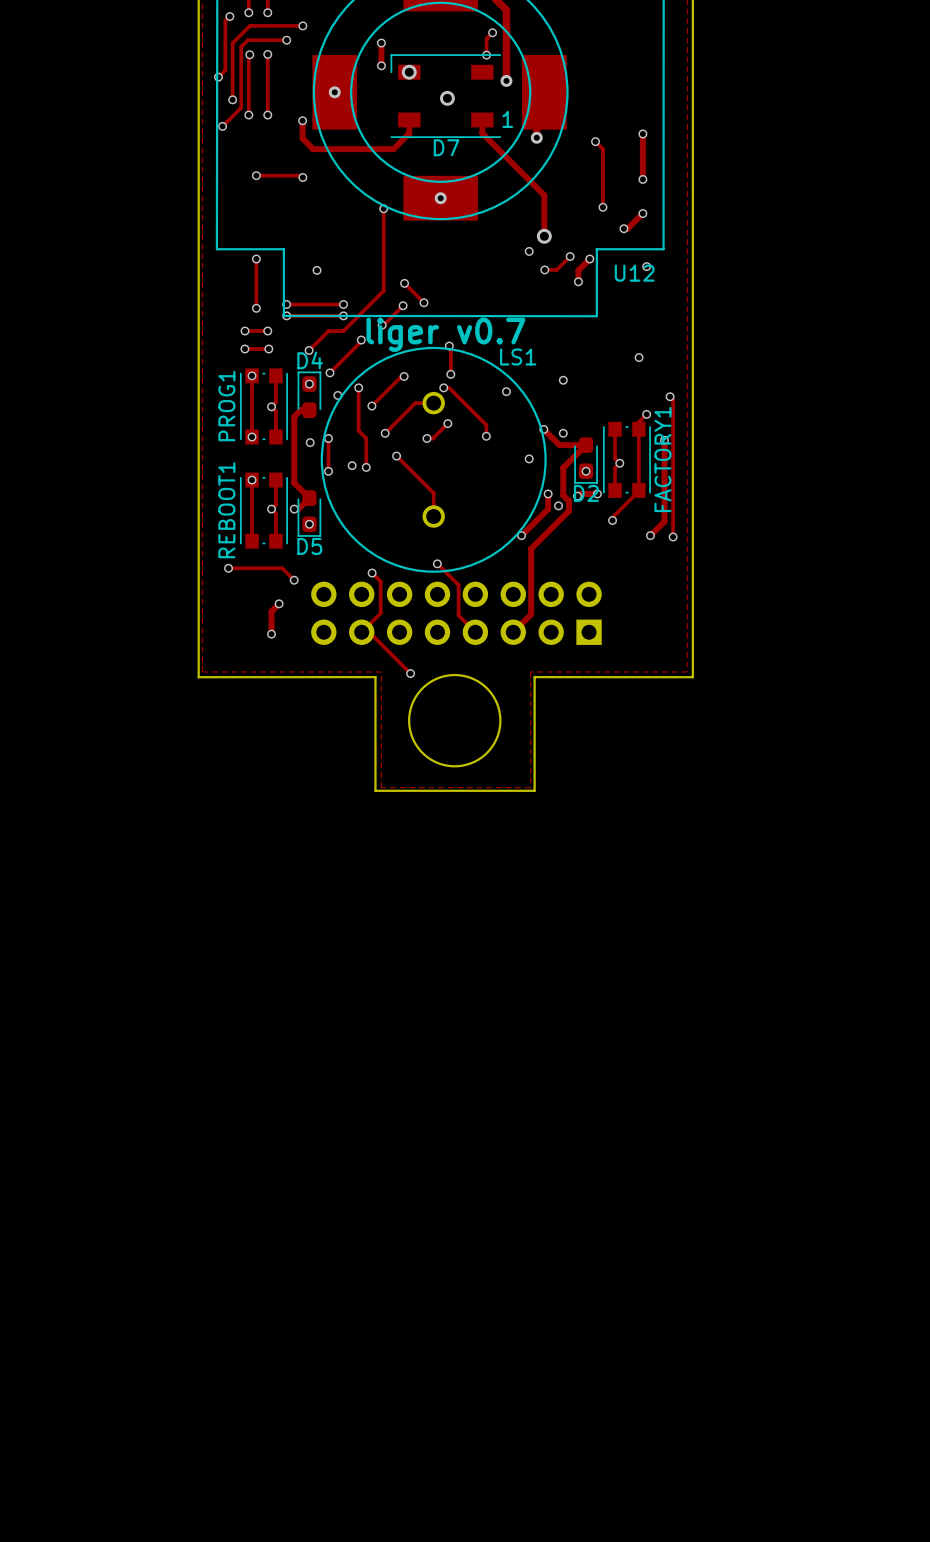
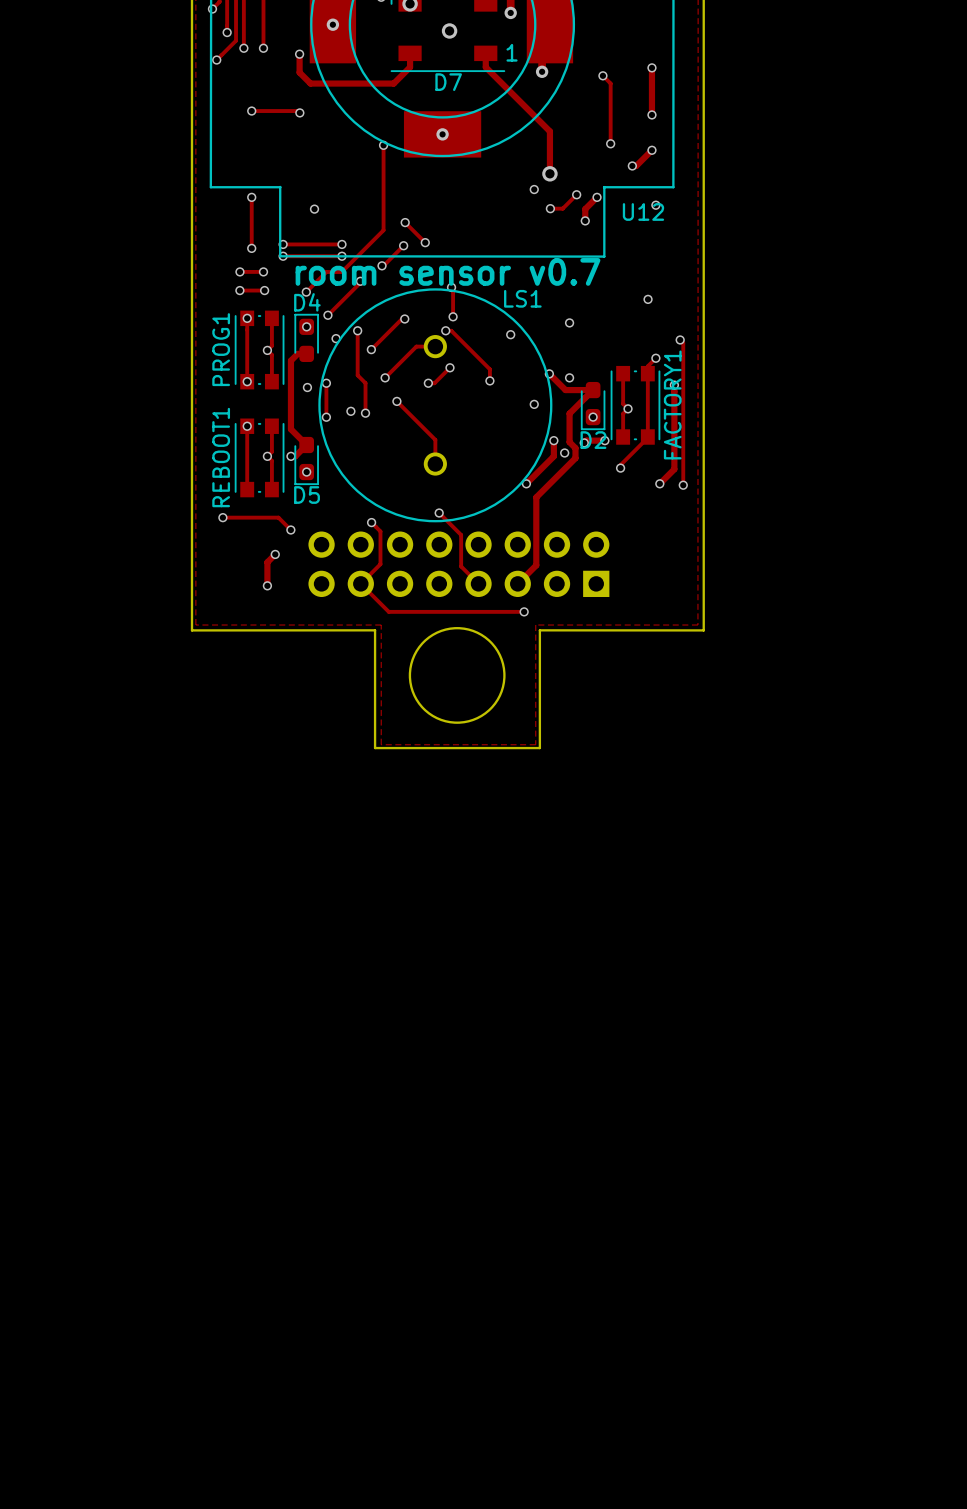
text: liger v0.7 (445, 334) -> room sensor v0.7 (448, 271)
track: none -> (360, 583) (388, 611) (524, 611)
track: (361, 635) (361, 632) (369, 632) (410, 673) -> none
via: none -> (524, 611)
via: (410, 673) -> none

